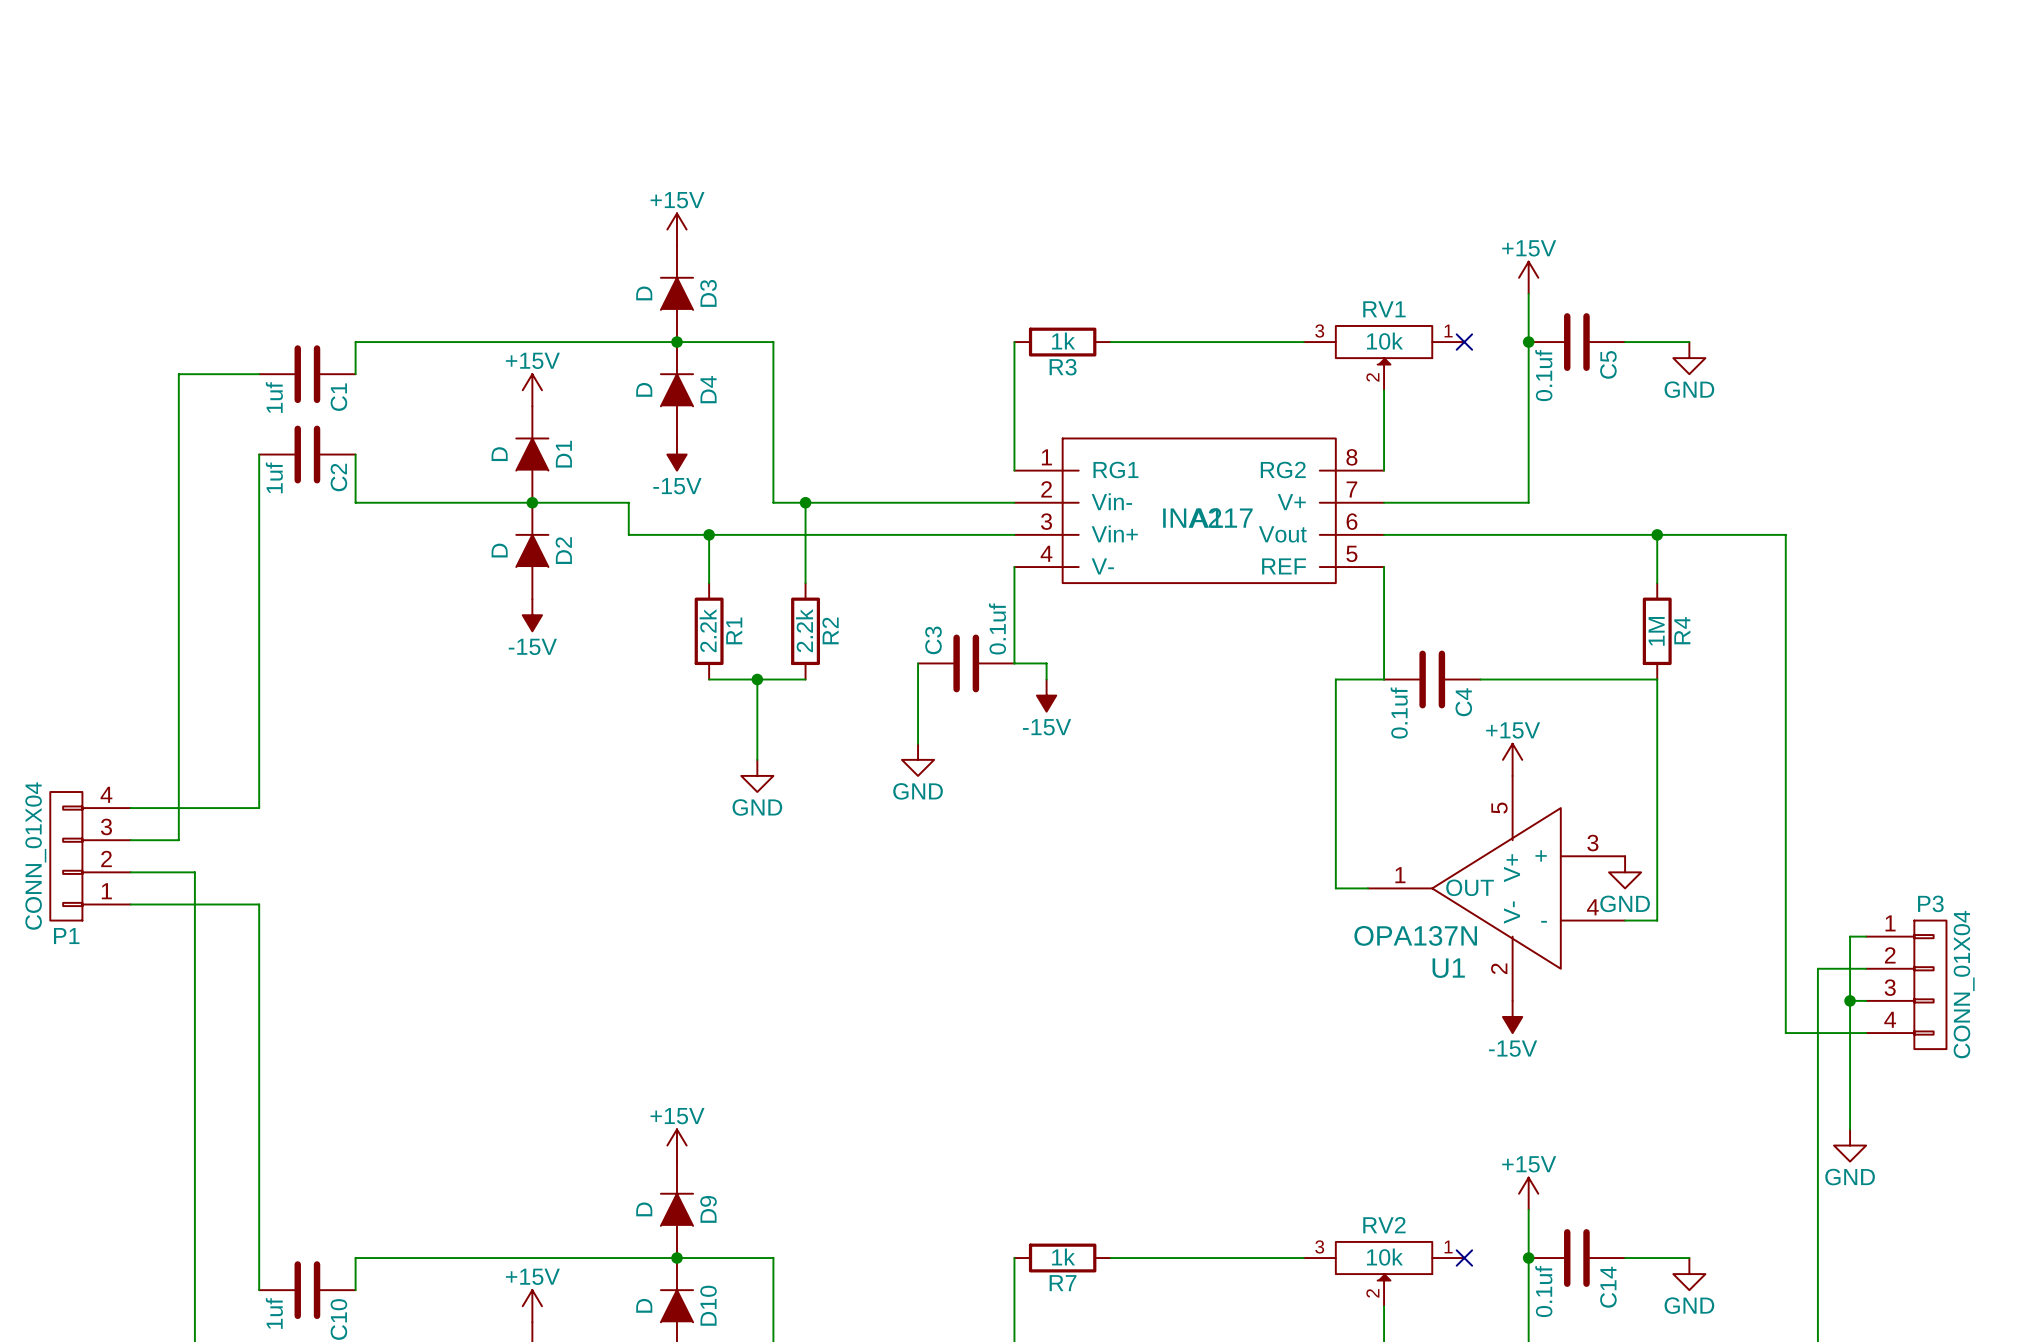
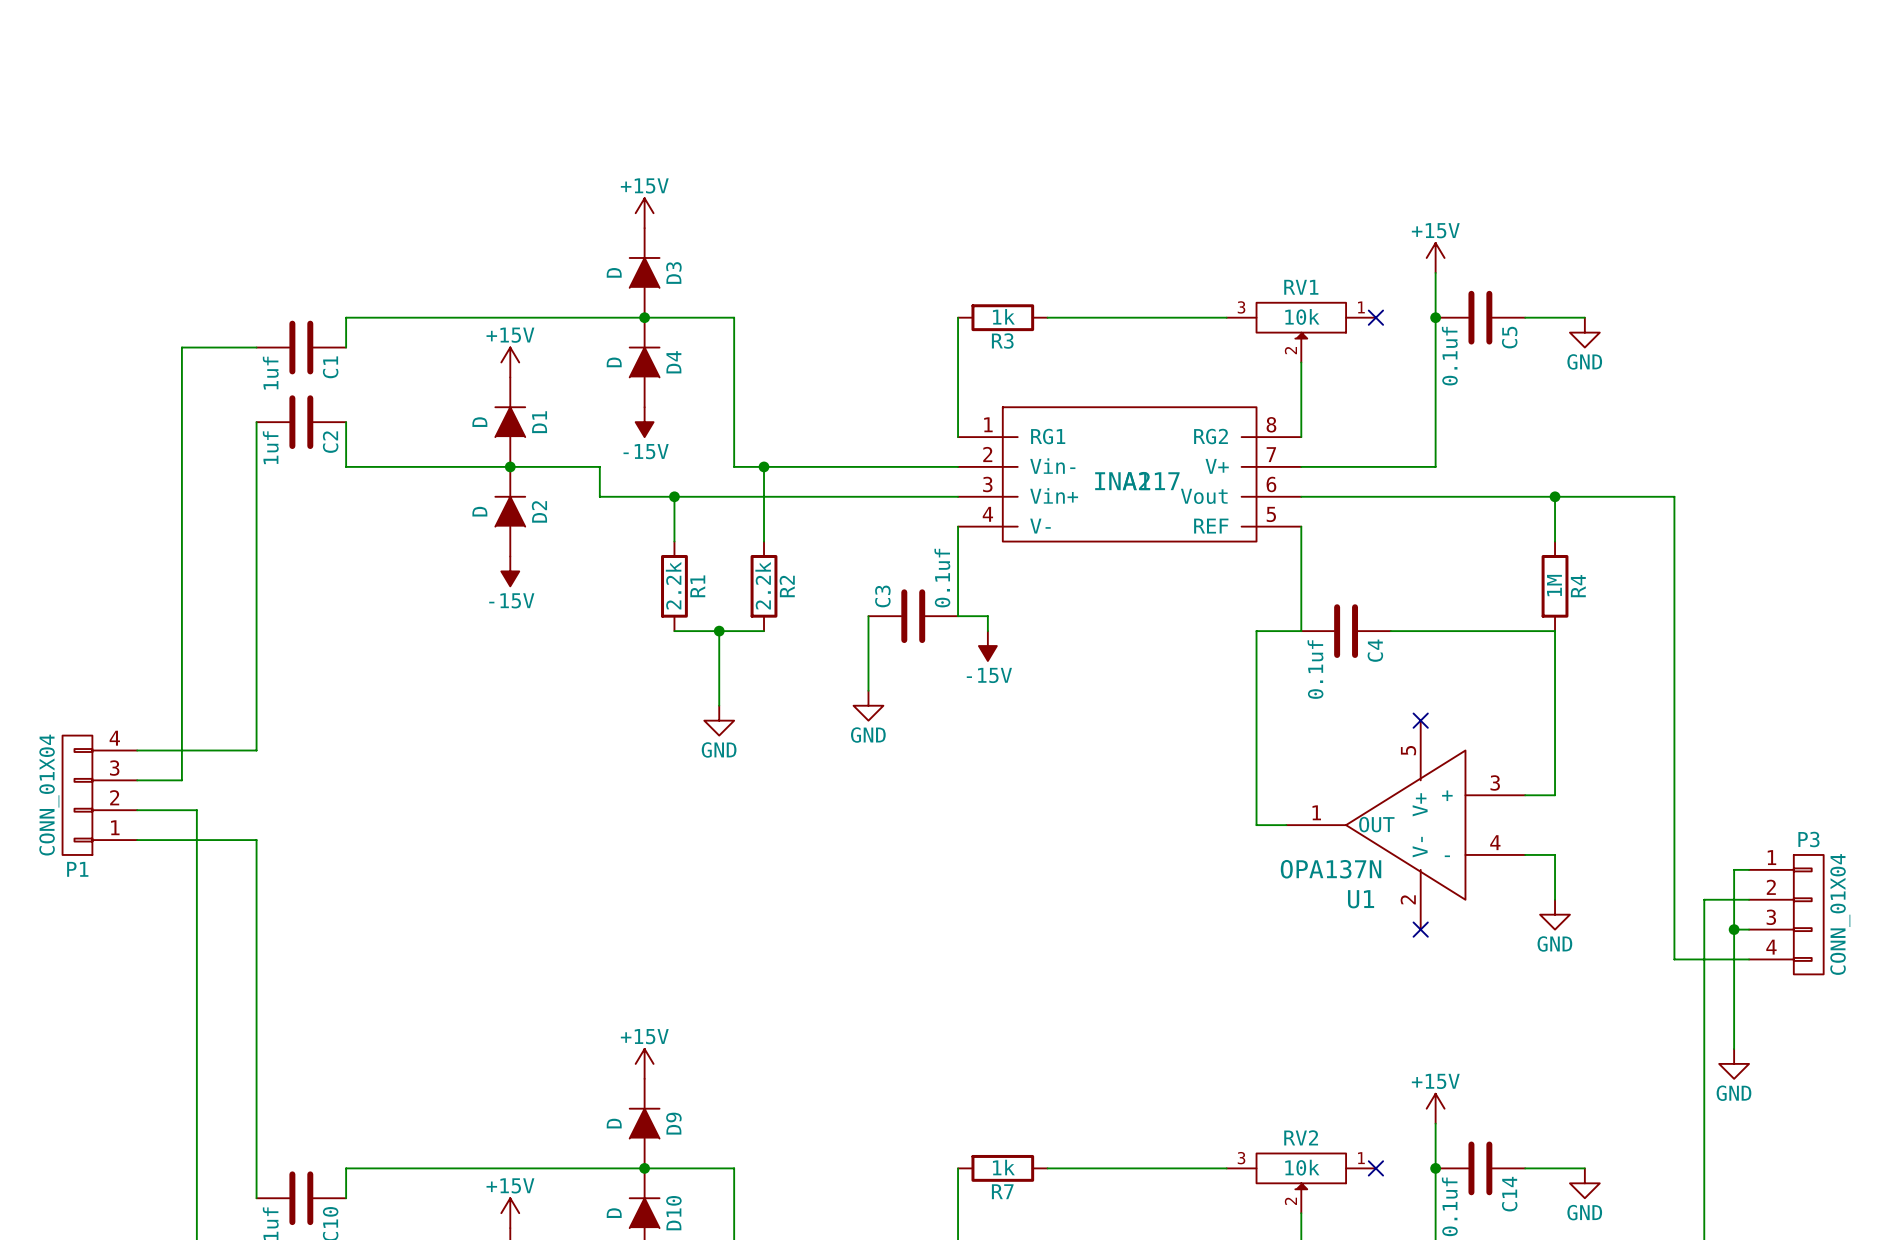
power symbol: +15V (1512, 759) -> none
no-connect mark: none -> (1420, 720)
wire: (1657, 856) (1657, 920) -> (1555, 795) (1525, 795)
power symbol position: GND (1625, 872) -> GND (1555, 914)
wire: none -> (1555, 854) (1555, 899)
no-connect mark: none -> (1420, 929)
power symbol: -15V (1512, 1016) -> none

